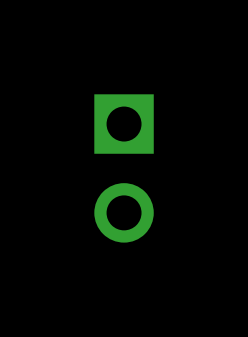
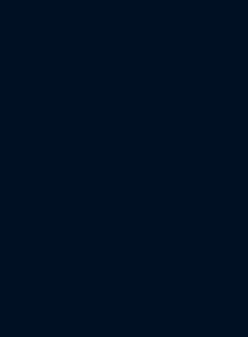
part: (124, 168) -> none

